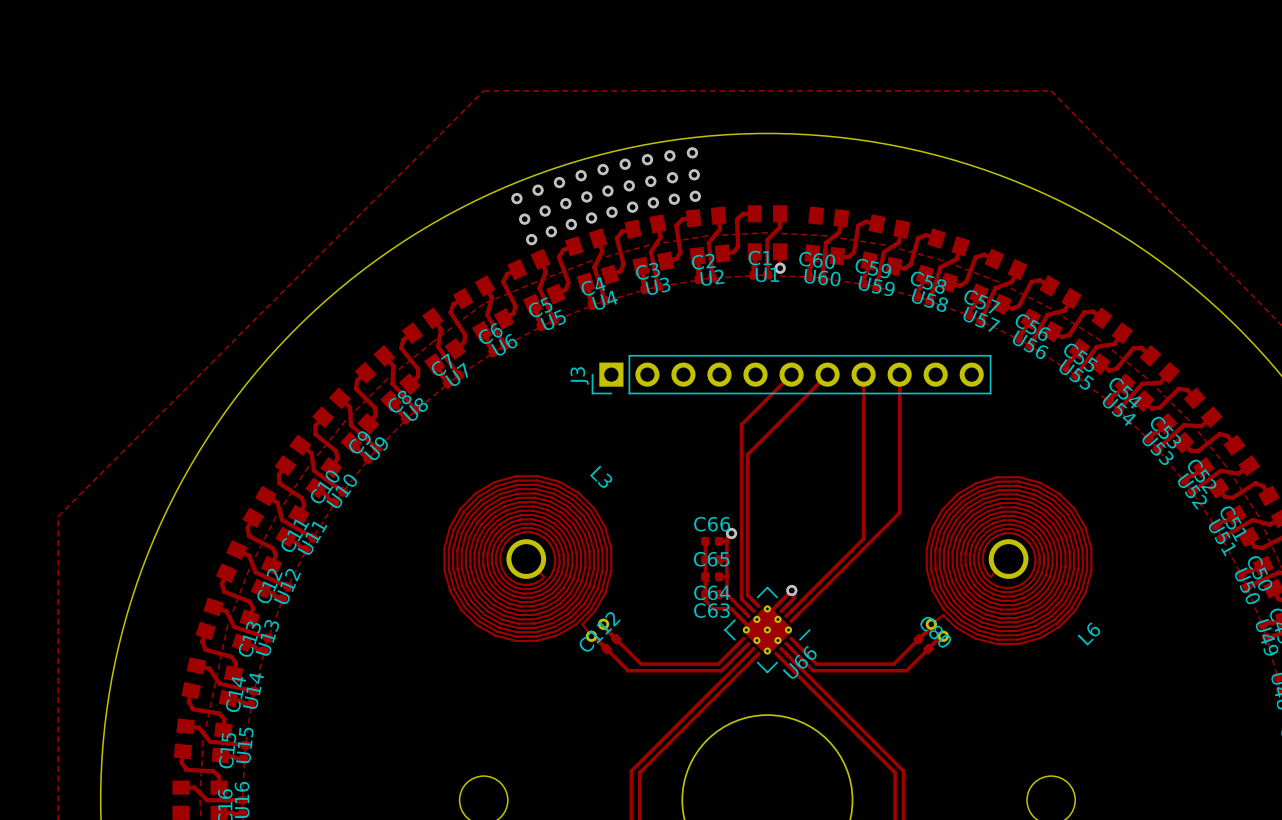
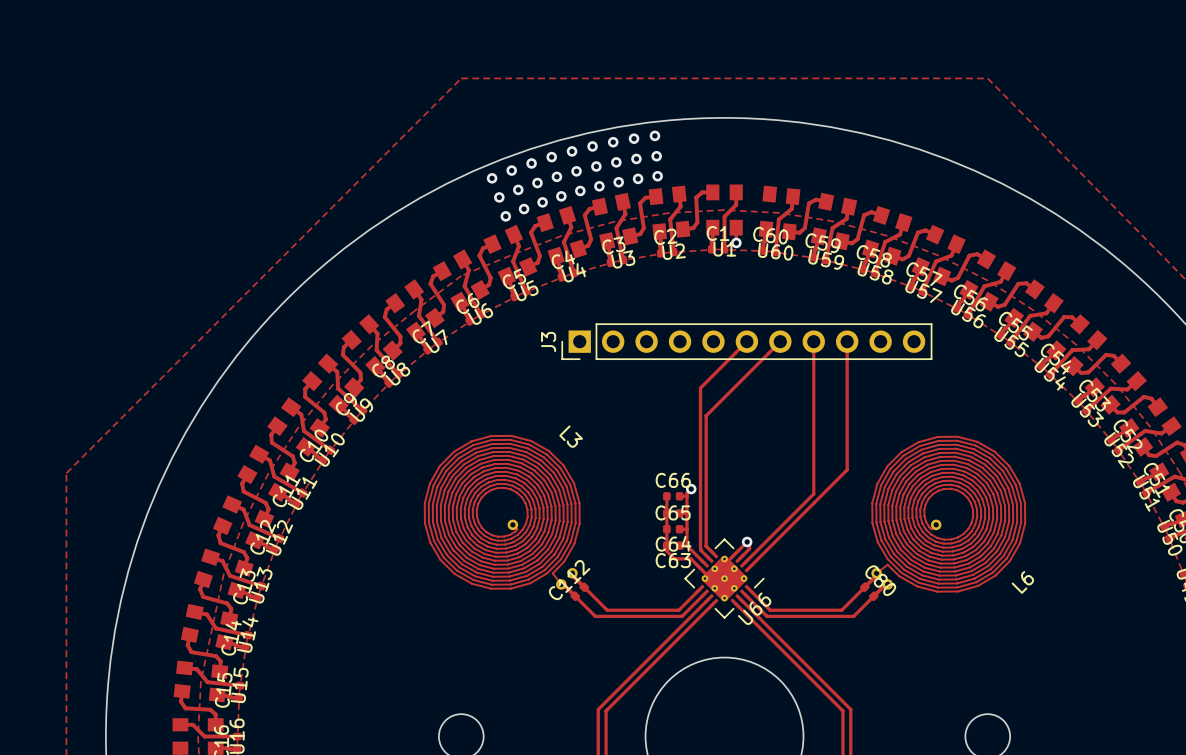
L3 footprint: [443, 475, 613, 642] -> [423, 434, 581, 590]
L6 footprint: [925, 476, 1093, 646] -> [871, 435, 1027, 593]

